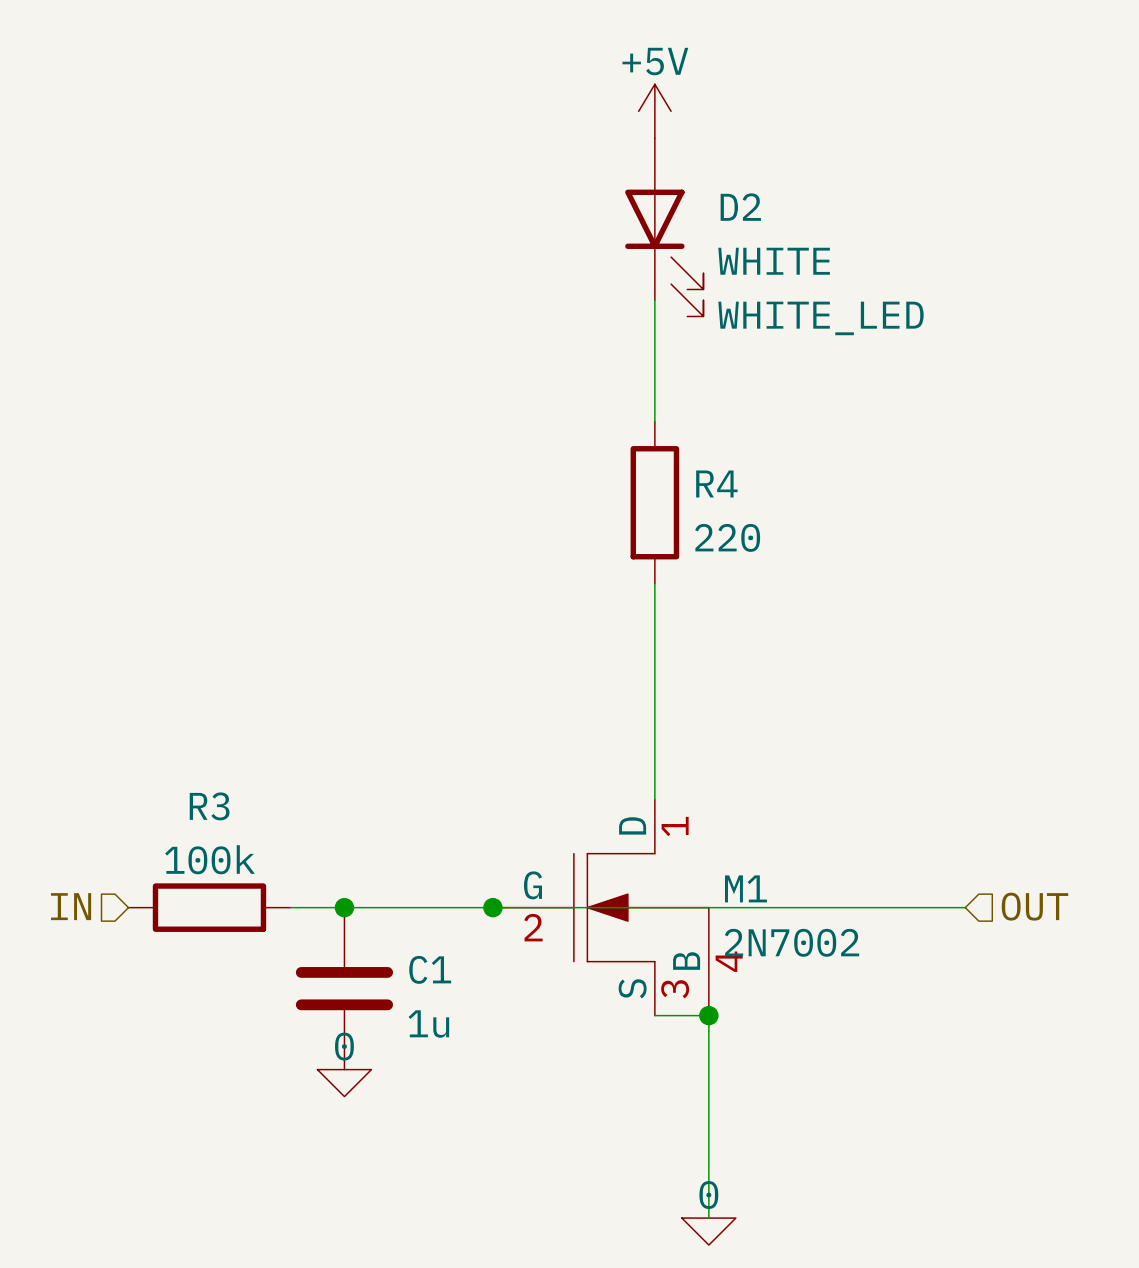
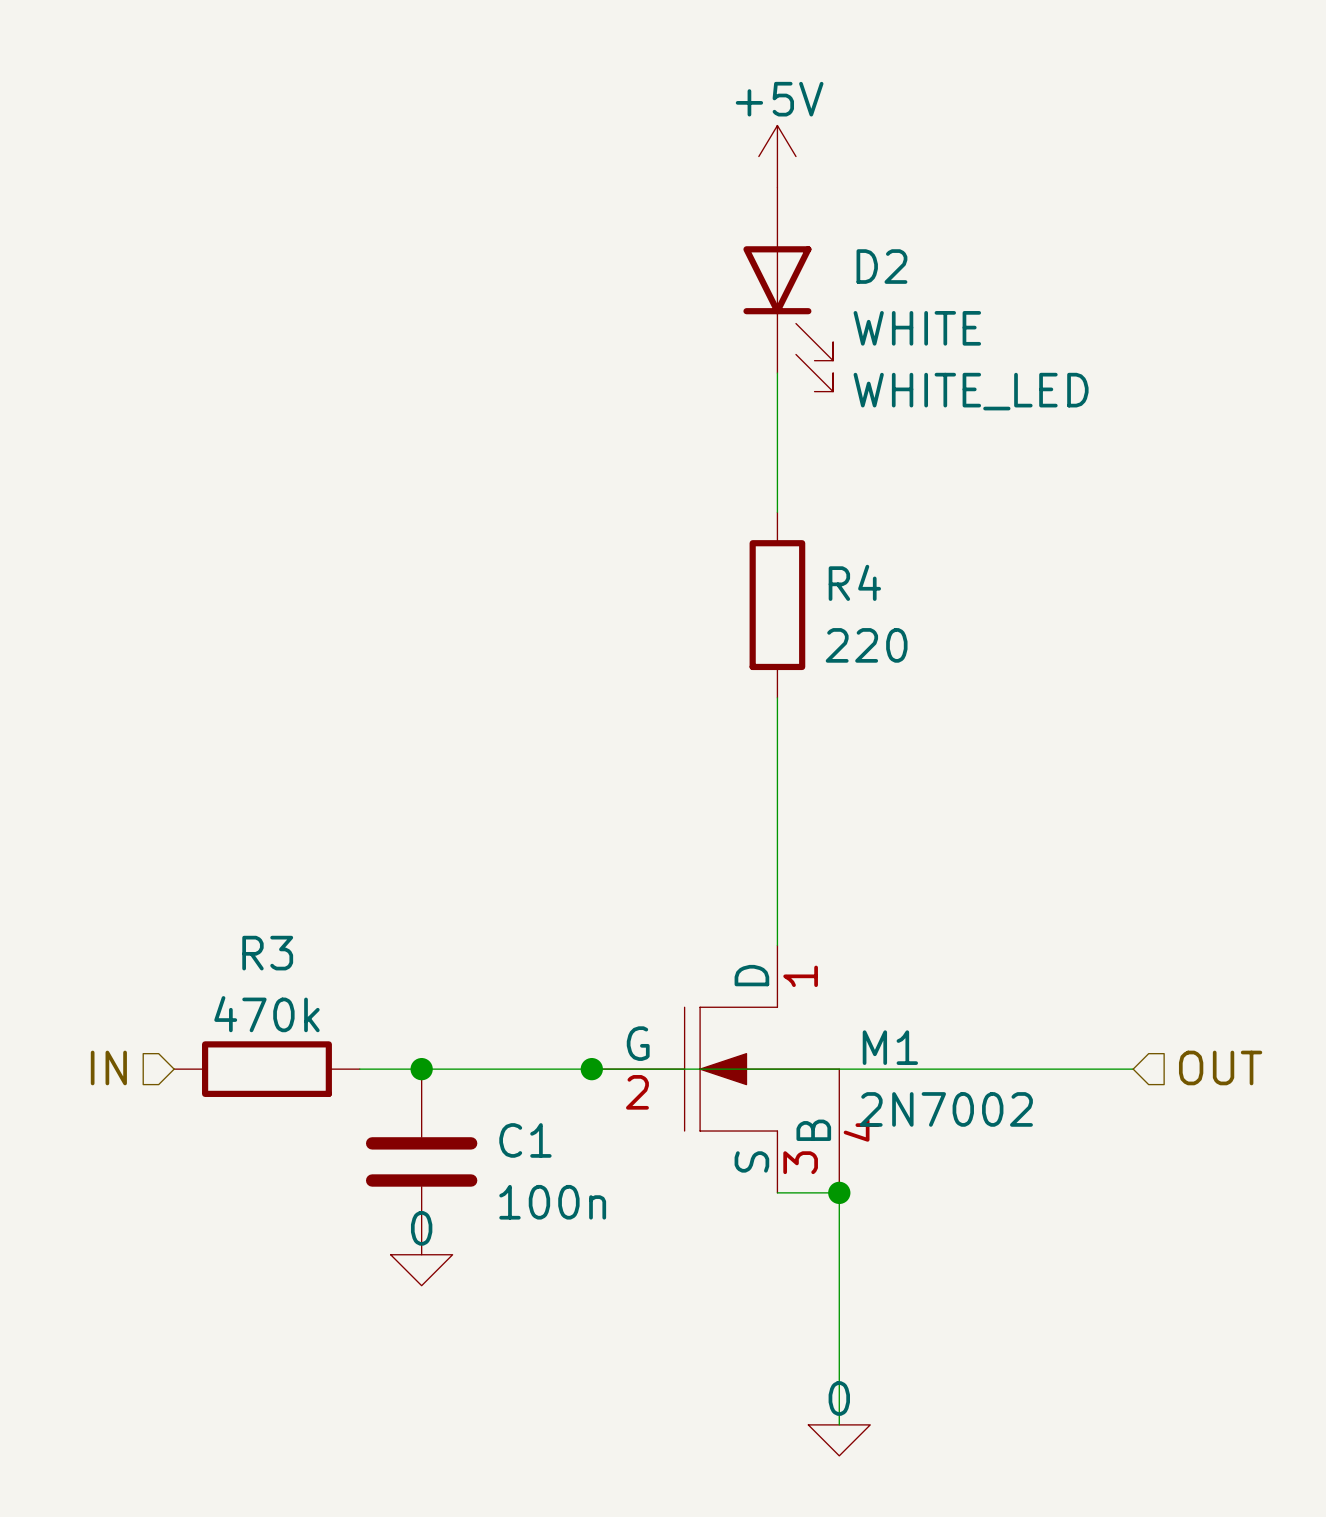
R3 value: 100k (210, 859) -> 470k (266, 1014)
C1 value: 1u (428, 1024) -> 100n (552, 1202)

